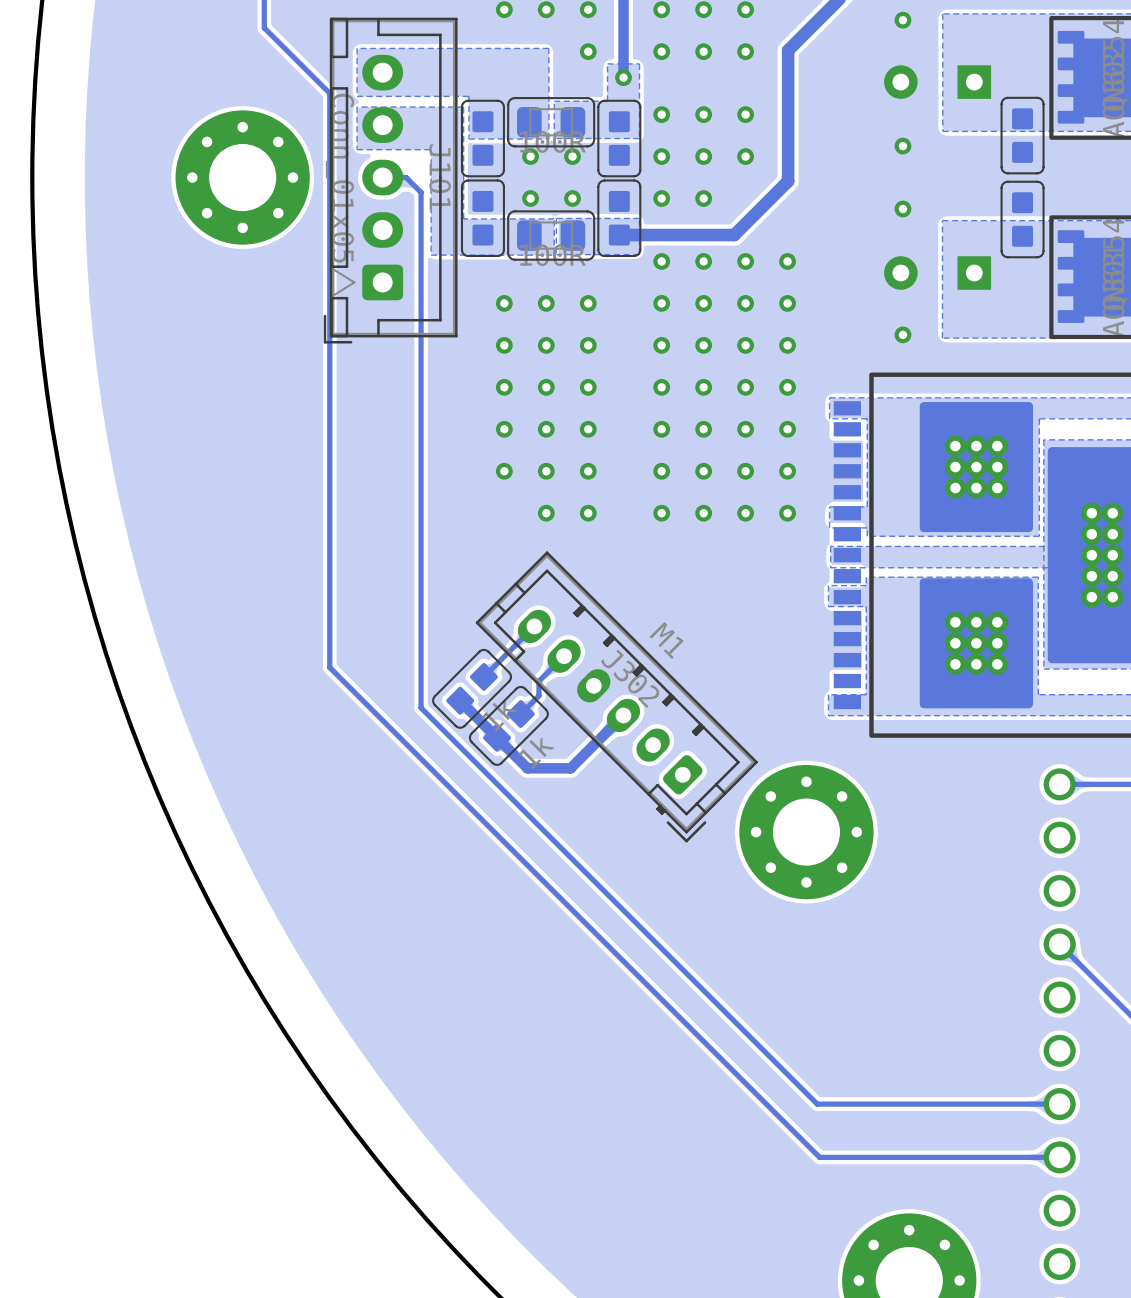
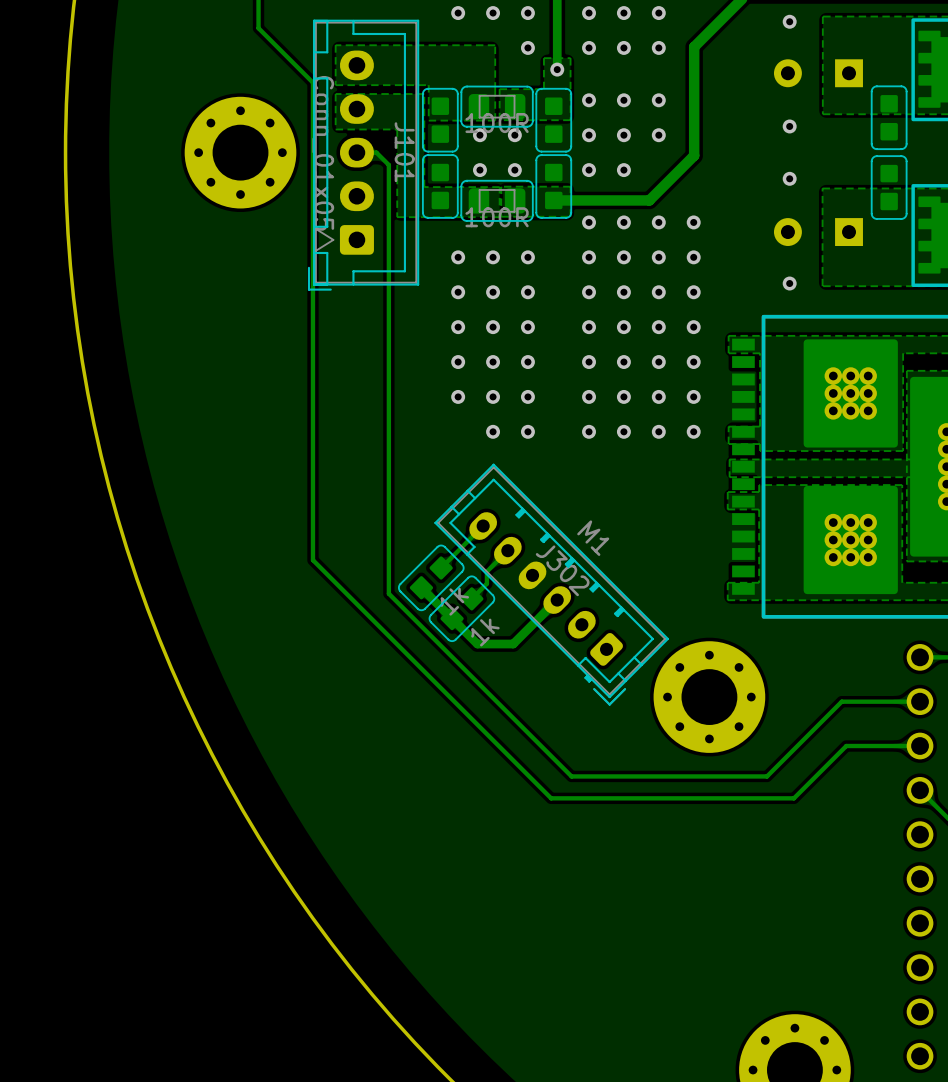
track: (640, 927) (817, 1104) (1059, 1104) -> (571, 776) (767, 776) (841, 701) (920, 701)
track: (616, 953) (819, 1157) (1059, 1157) -> (551, 798) (793, 798) (846, 746) (920, 746)

